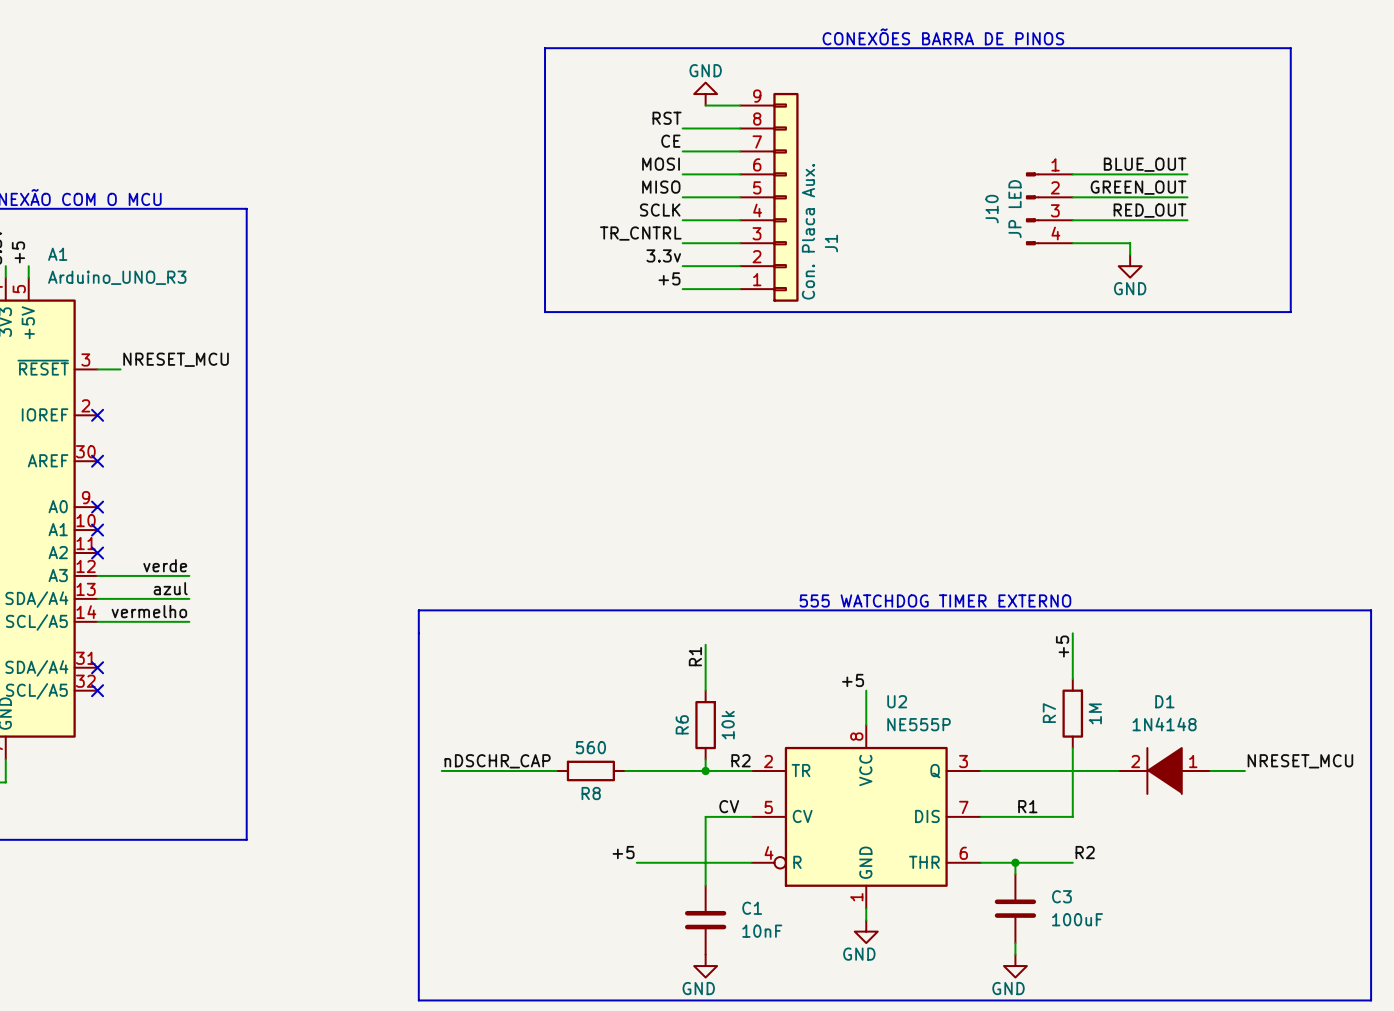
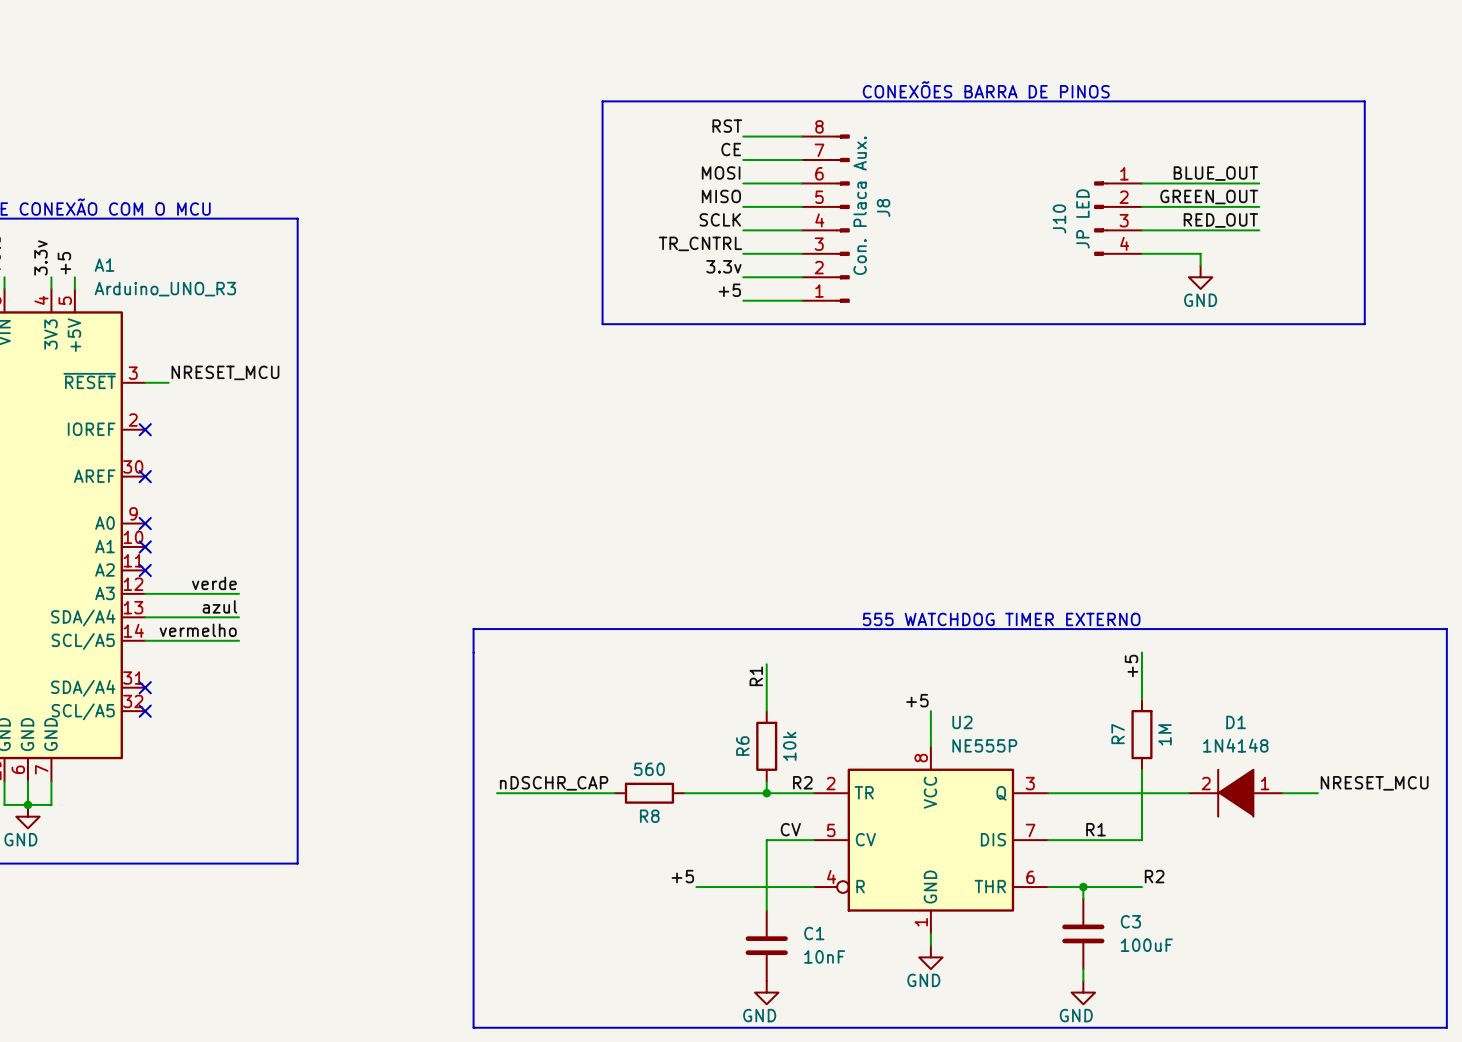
text position: CONEXÕES BARRA DE PINOS (943, 36) -> CONEXÕES BARRA DE PINOS (986, 89)
line: (545, 94) (545, 48) (1290, 48) (1290, 94) -> (602, 101) (1364, 101)
power symbol: GND (705, 94) -> none
wire: (705, 105) (740, 105) -> none
J1: Con. Placa Aux. (769, 197) -> none
J8: none -> Con. Placa Aux. (825, 218)

